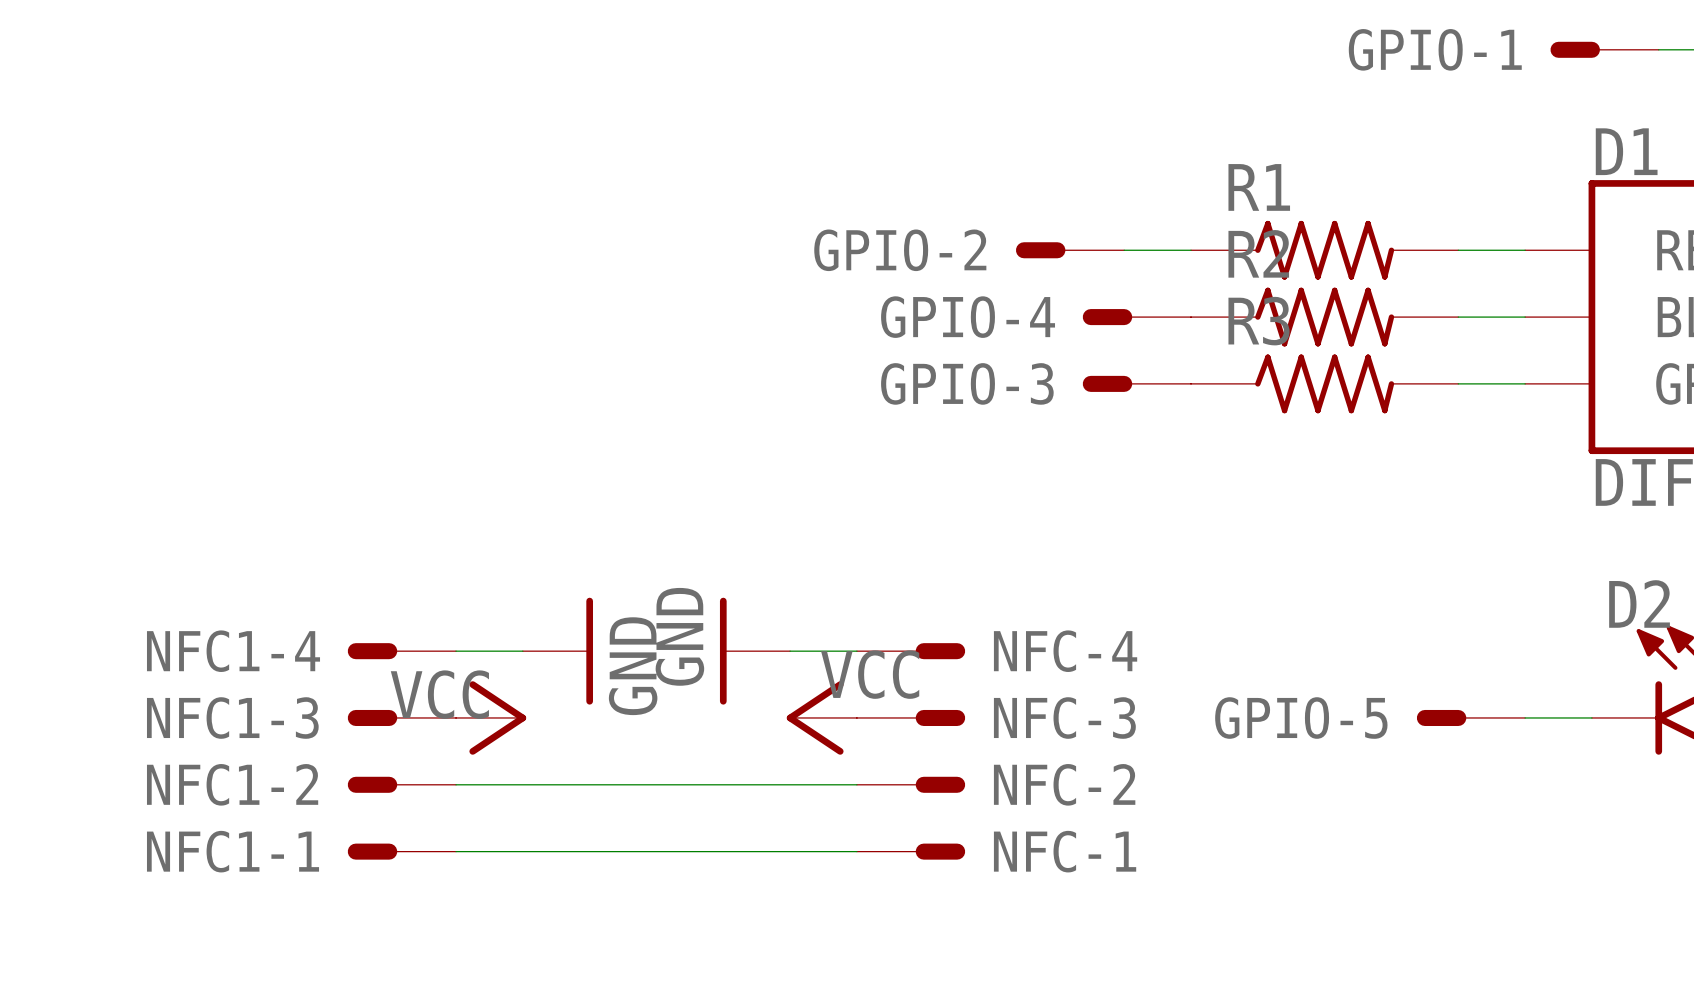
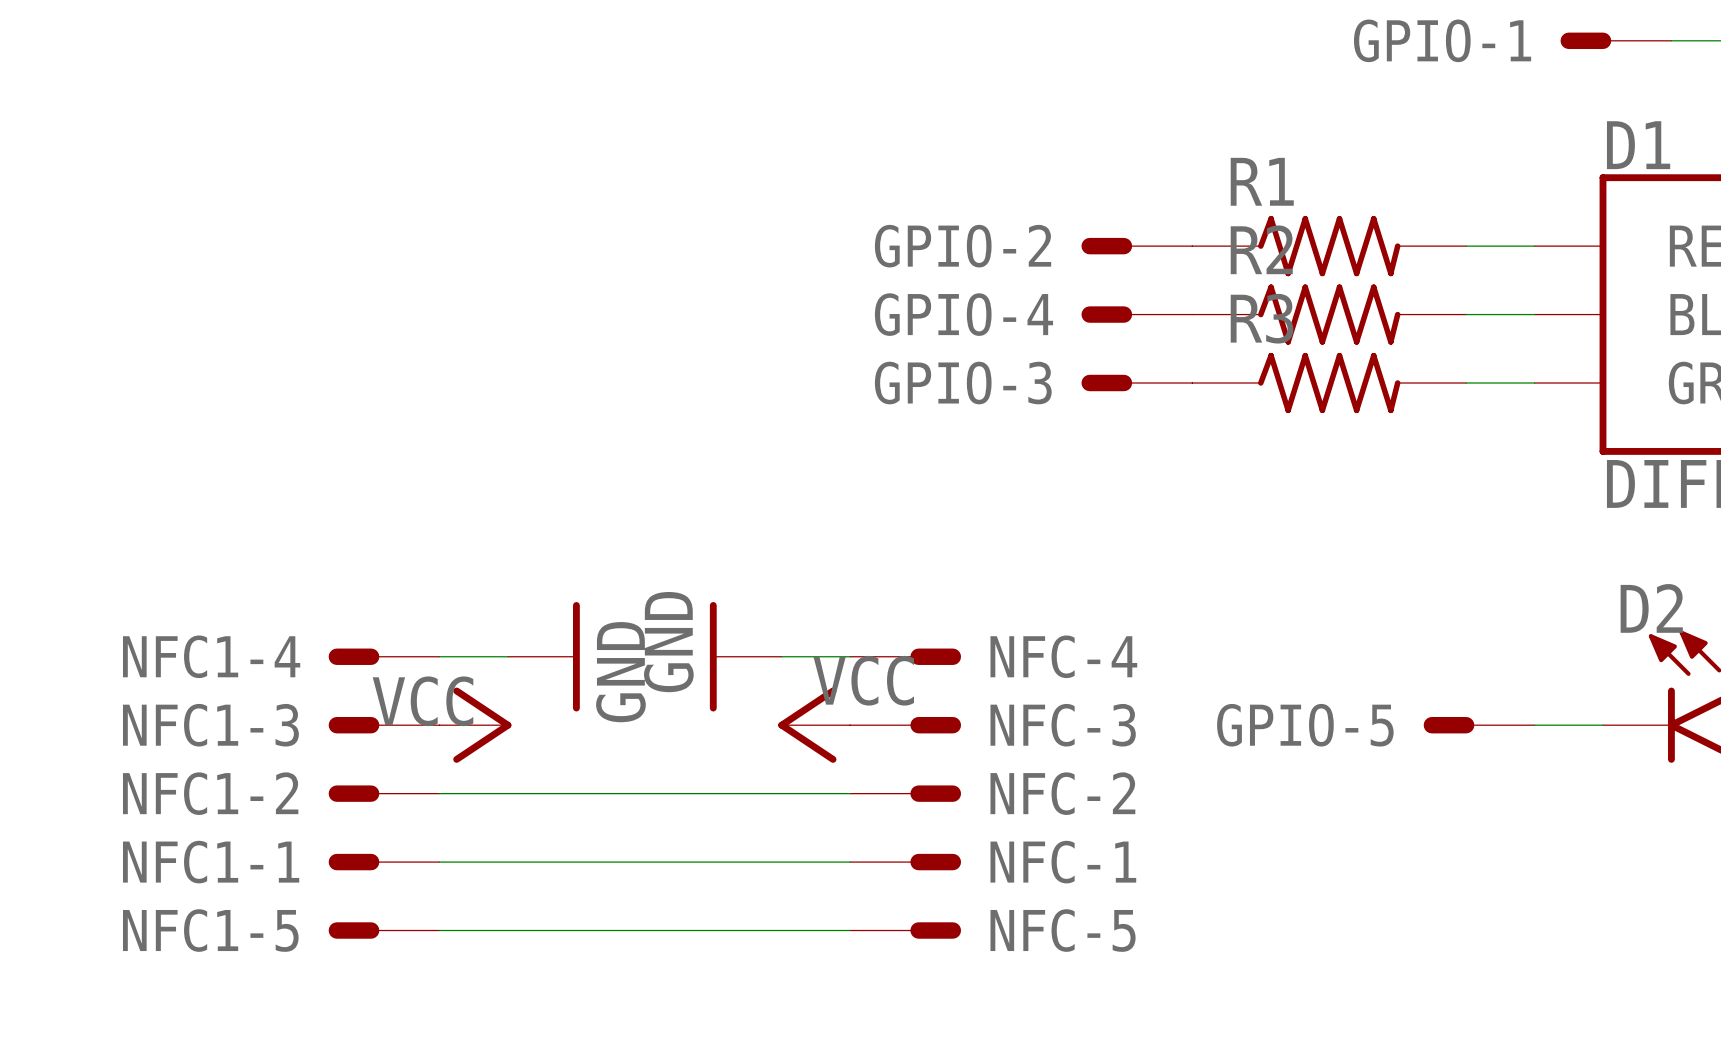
GPIO-2 position: (1070, 250) -> (1136, 246)
NFC1-5: none -> (384, 930)
wire: none -> (439, 930) (850, 930)
NFC-5: none -> (905, 930)

